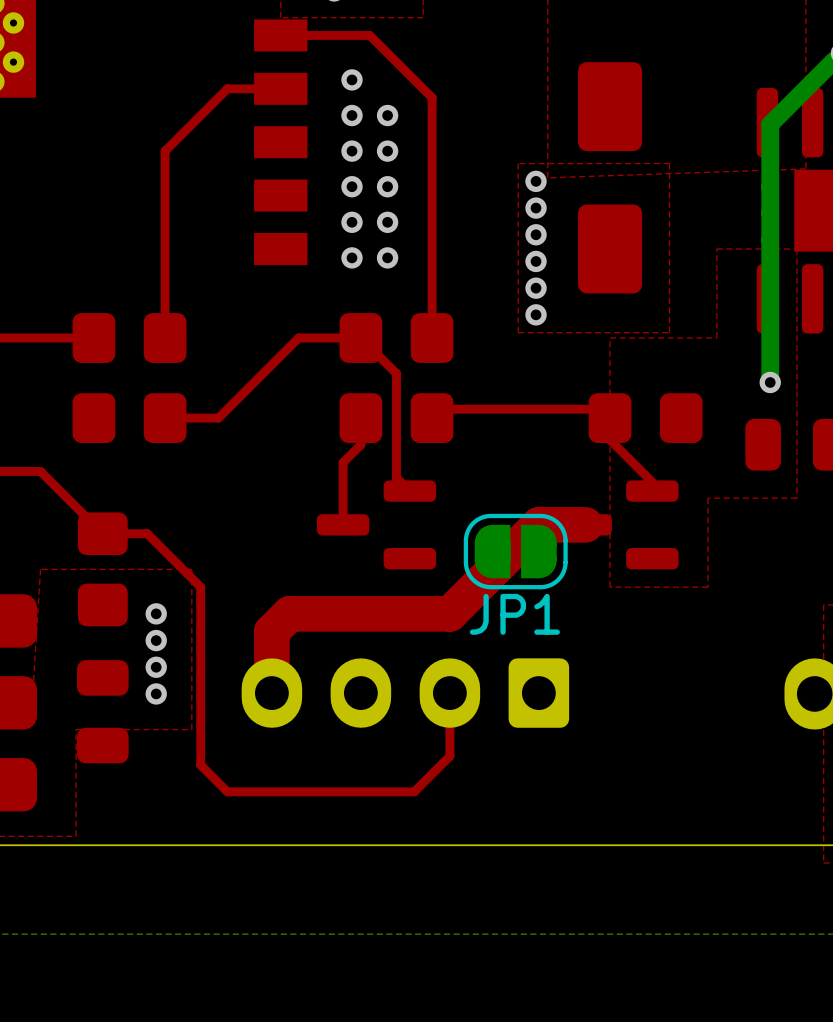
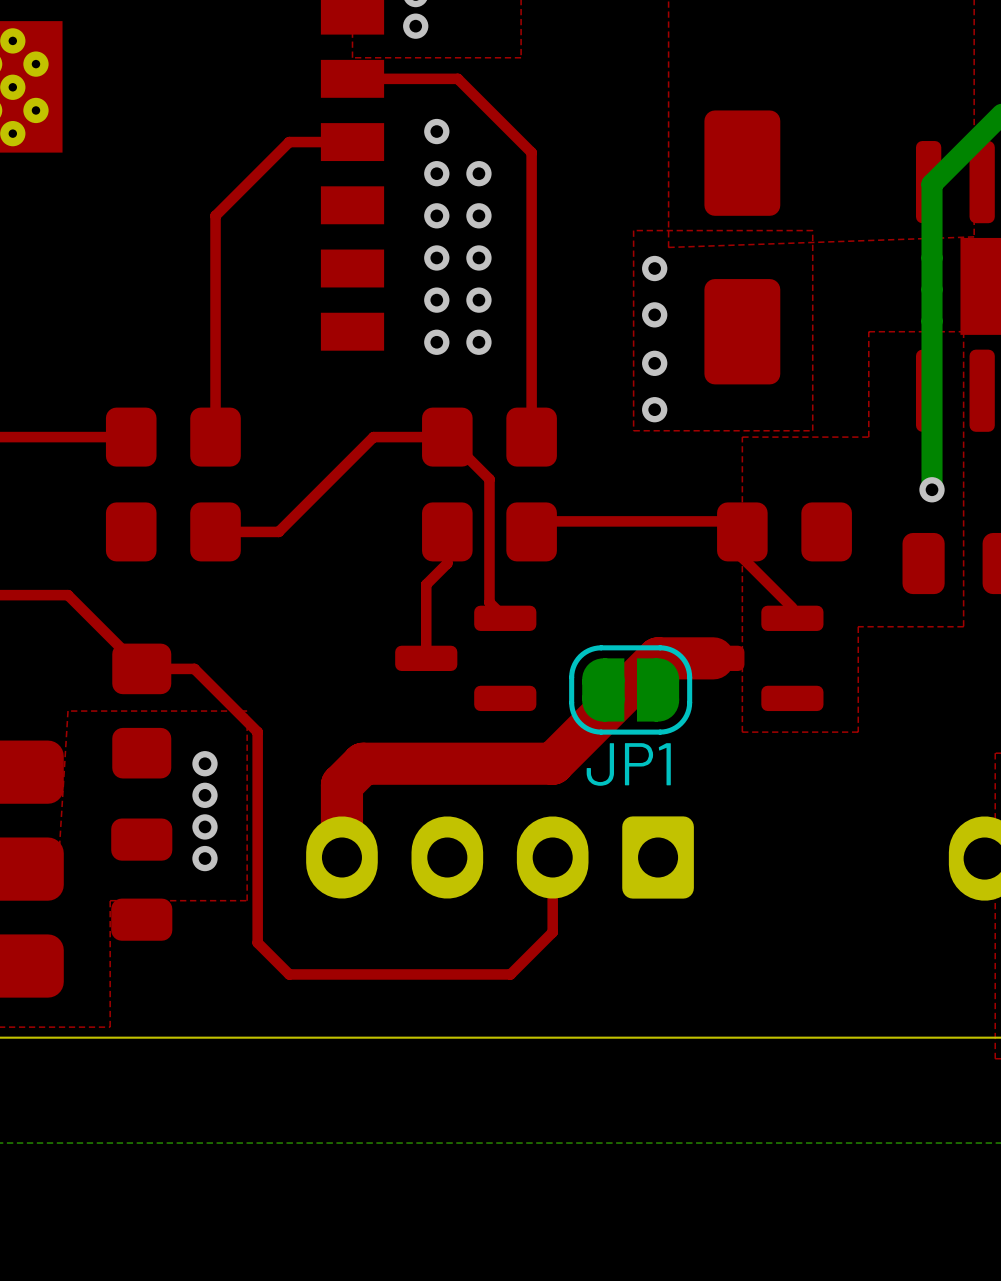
via: (536, 181) -> none
via: none -> (654, 268)
via: (536, 208) -> none
via: (536, 261) -> none
via: none -> (654, 363)
via: (536, 288) -> none

